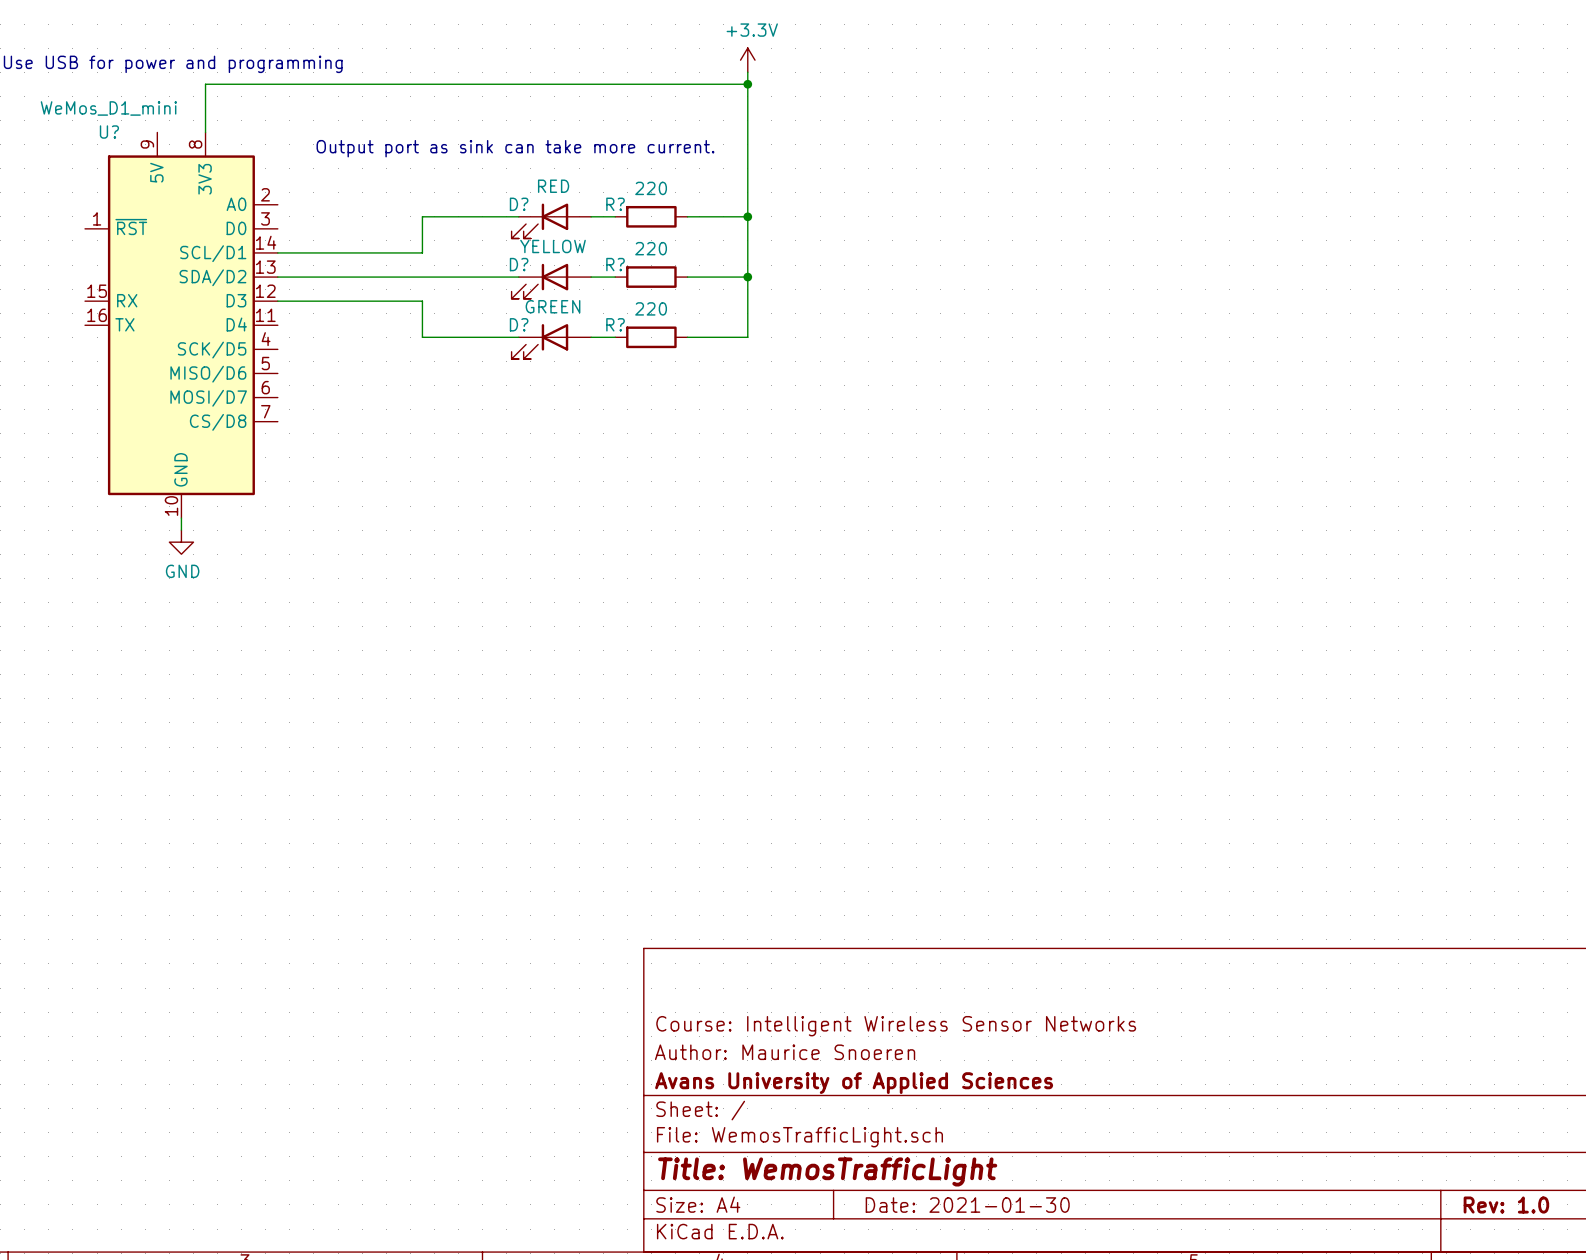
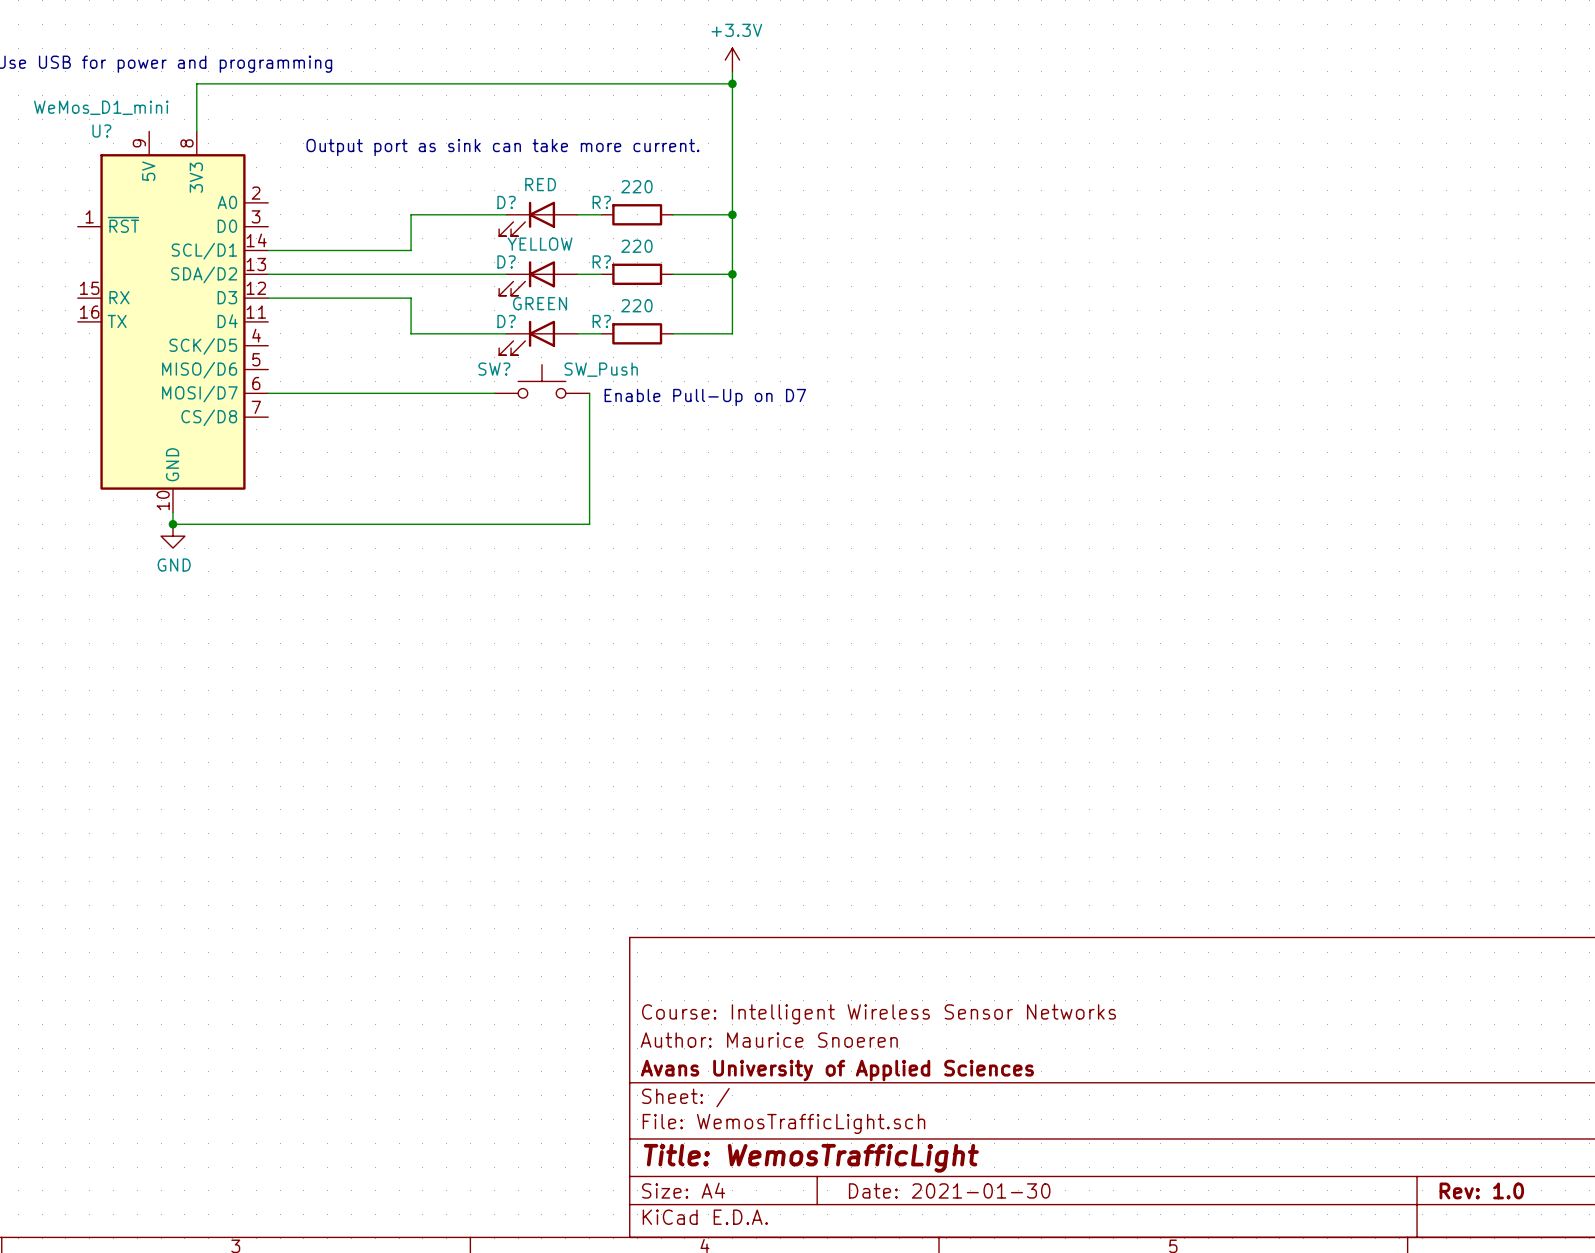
SW?: none -> SW_Push (541, 381)
wire: none -> (268, 393) (494, 393)
wire: none -> (589, 393) (589, 524) (172, 524)
text: none -> Enable Pull-Up on D7 (705, 397)
junction: none -> (172, 524)

